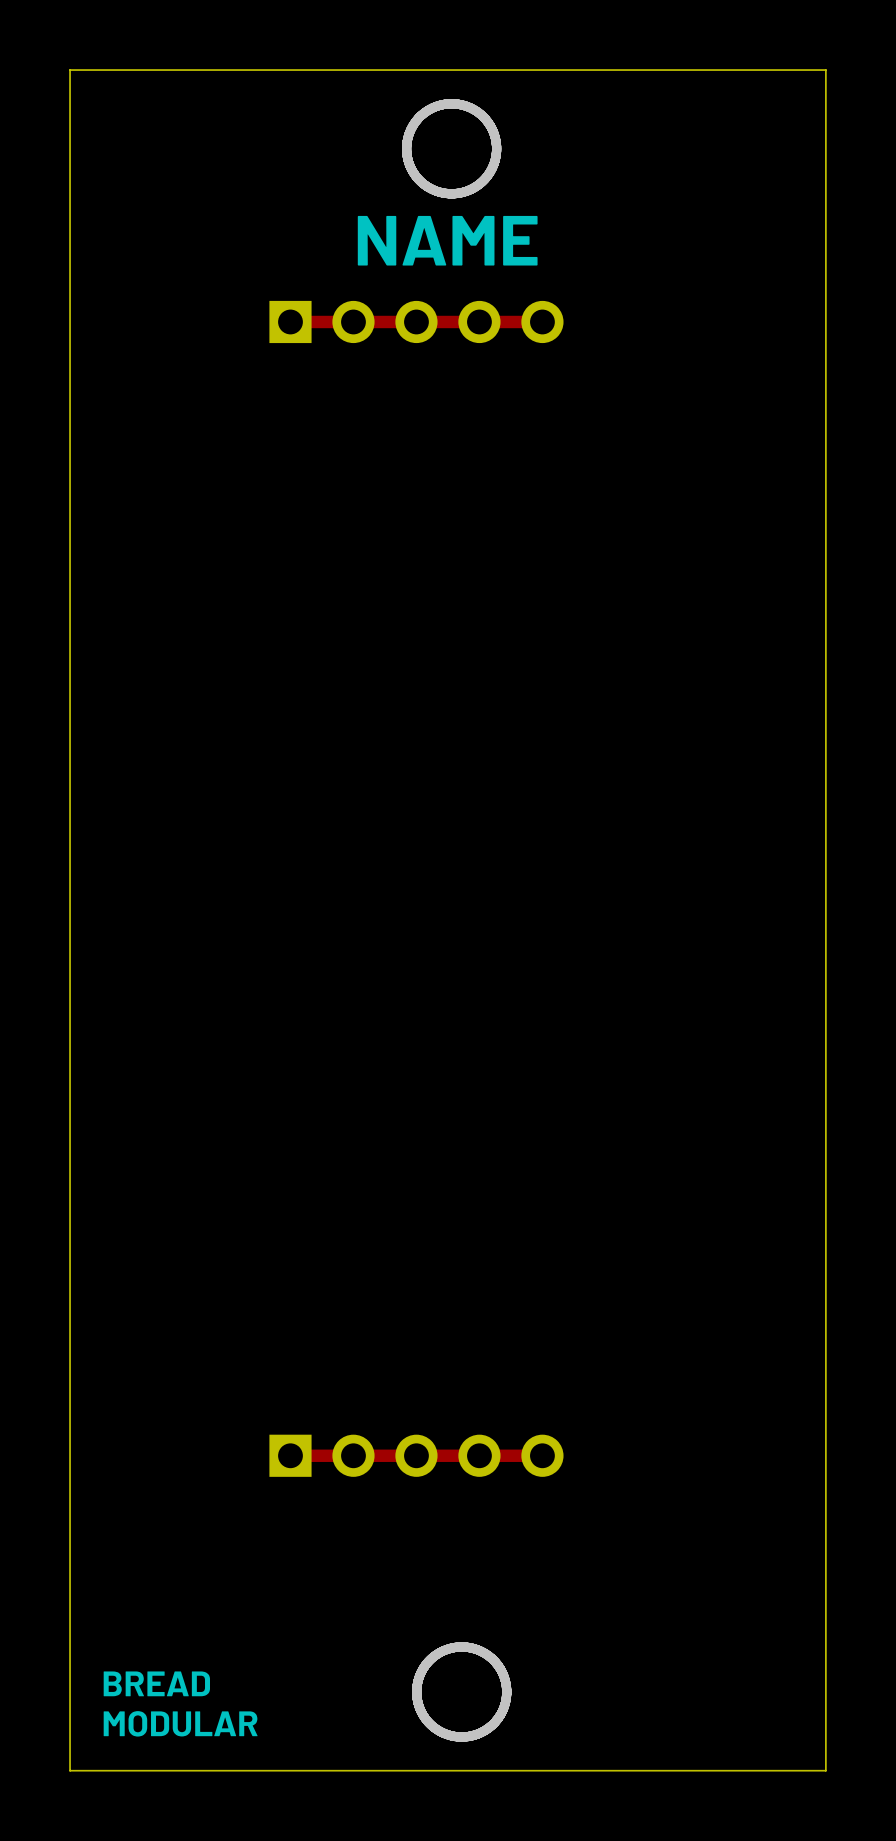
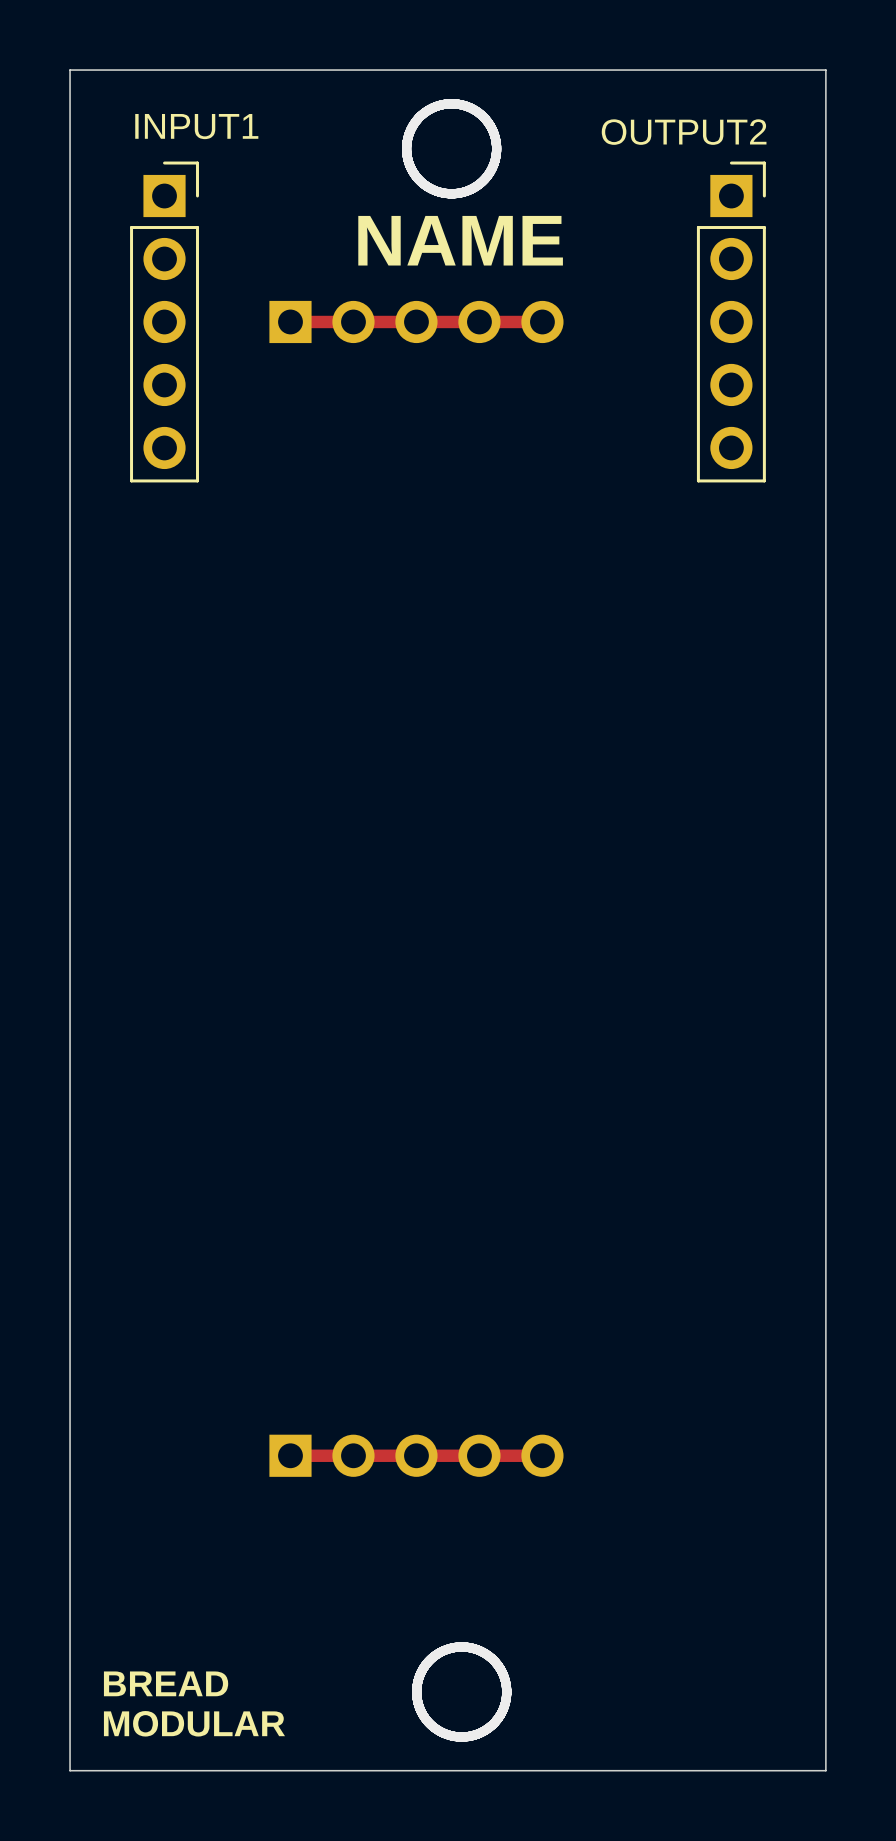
INPUT1: none -> (164, 321)
OUTPUT2: none -> (731, 321)

